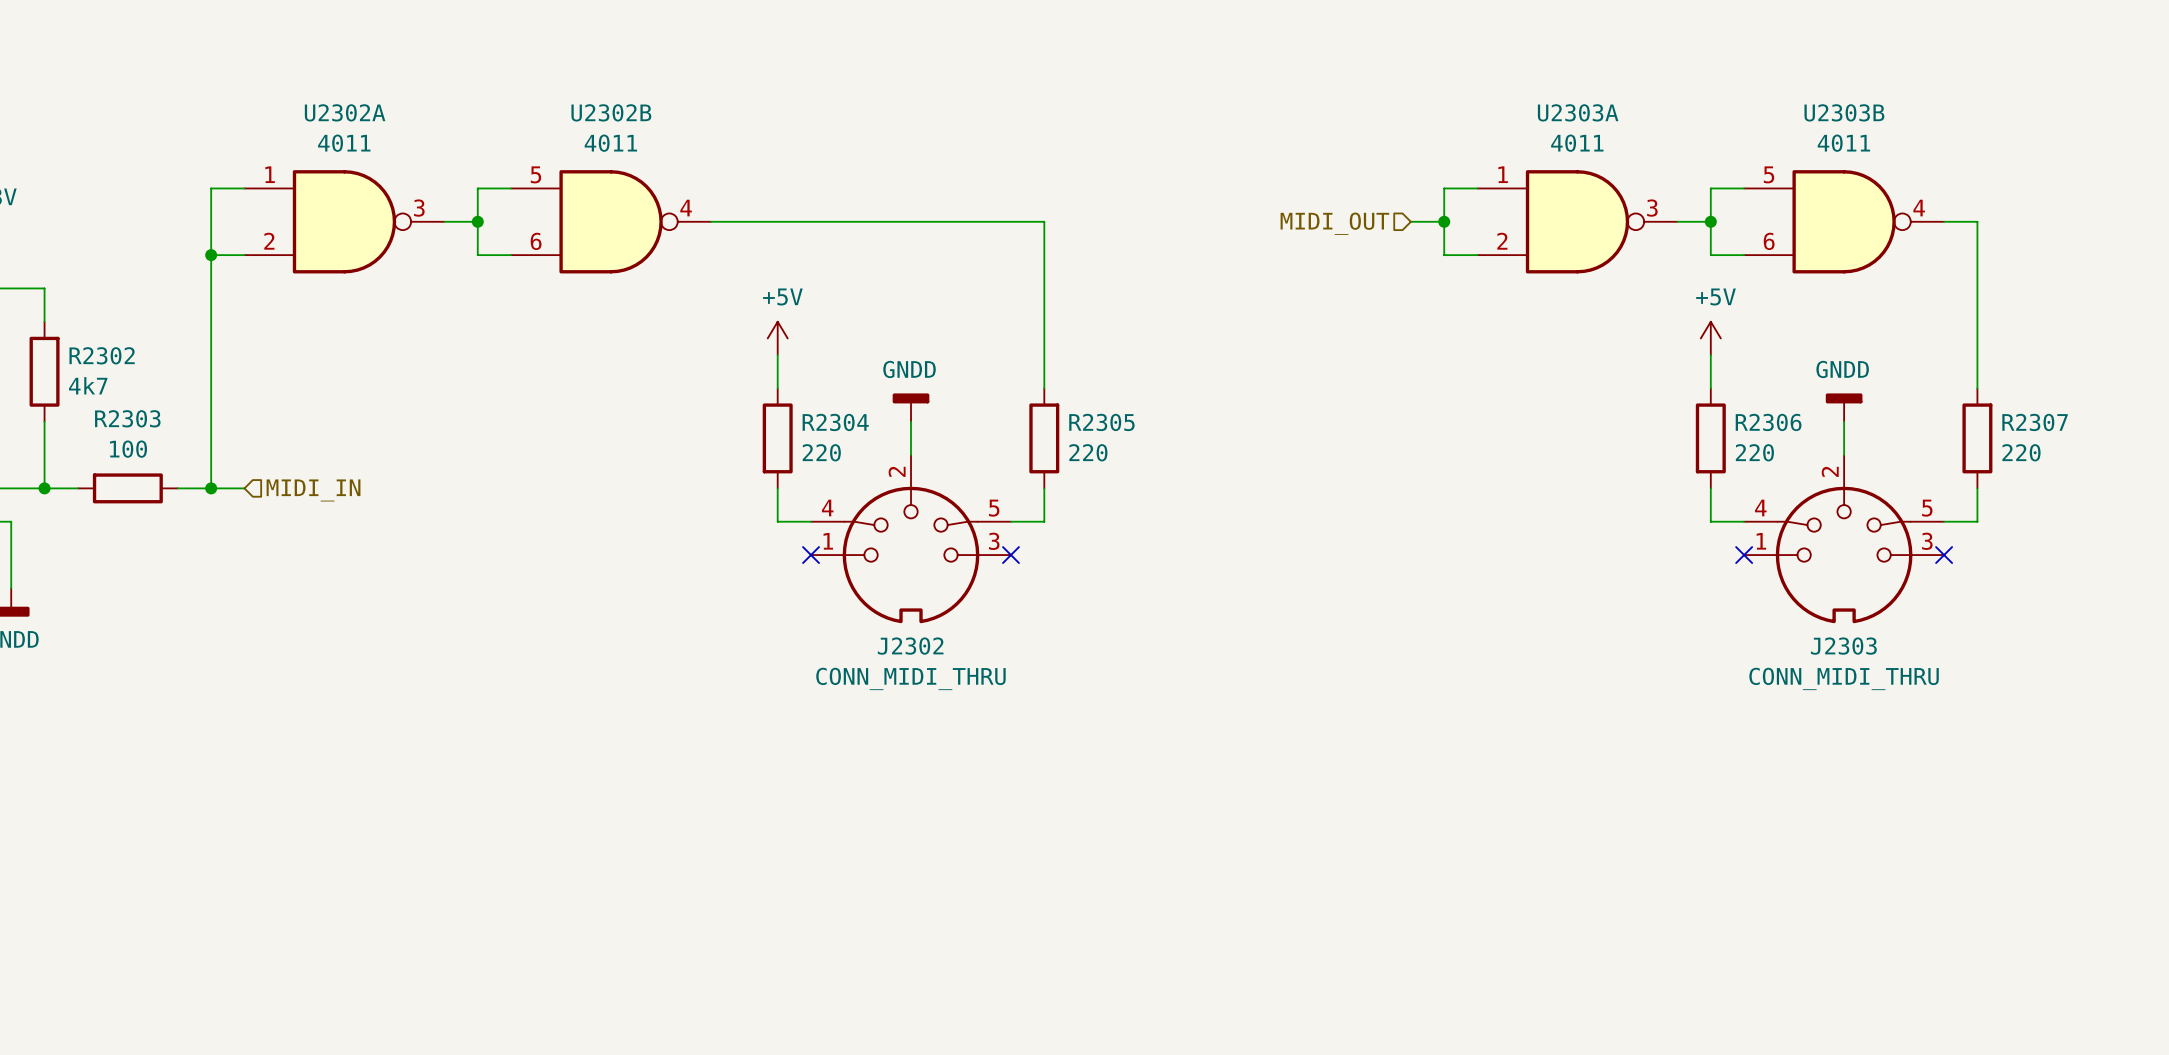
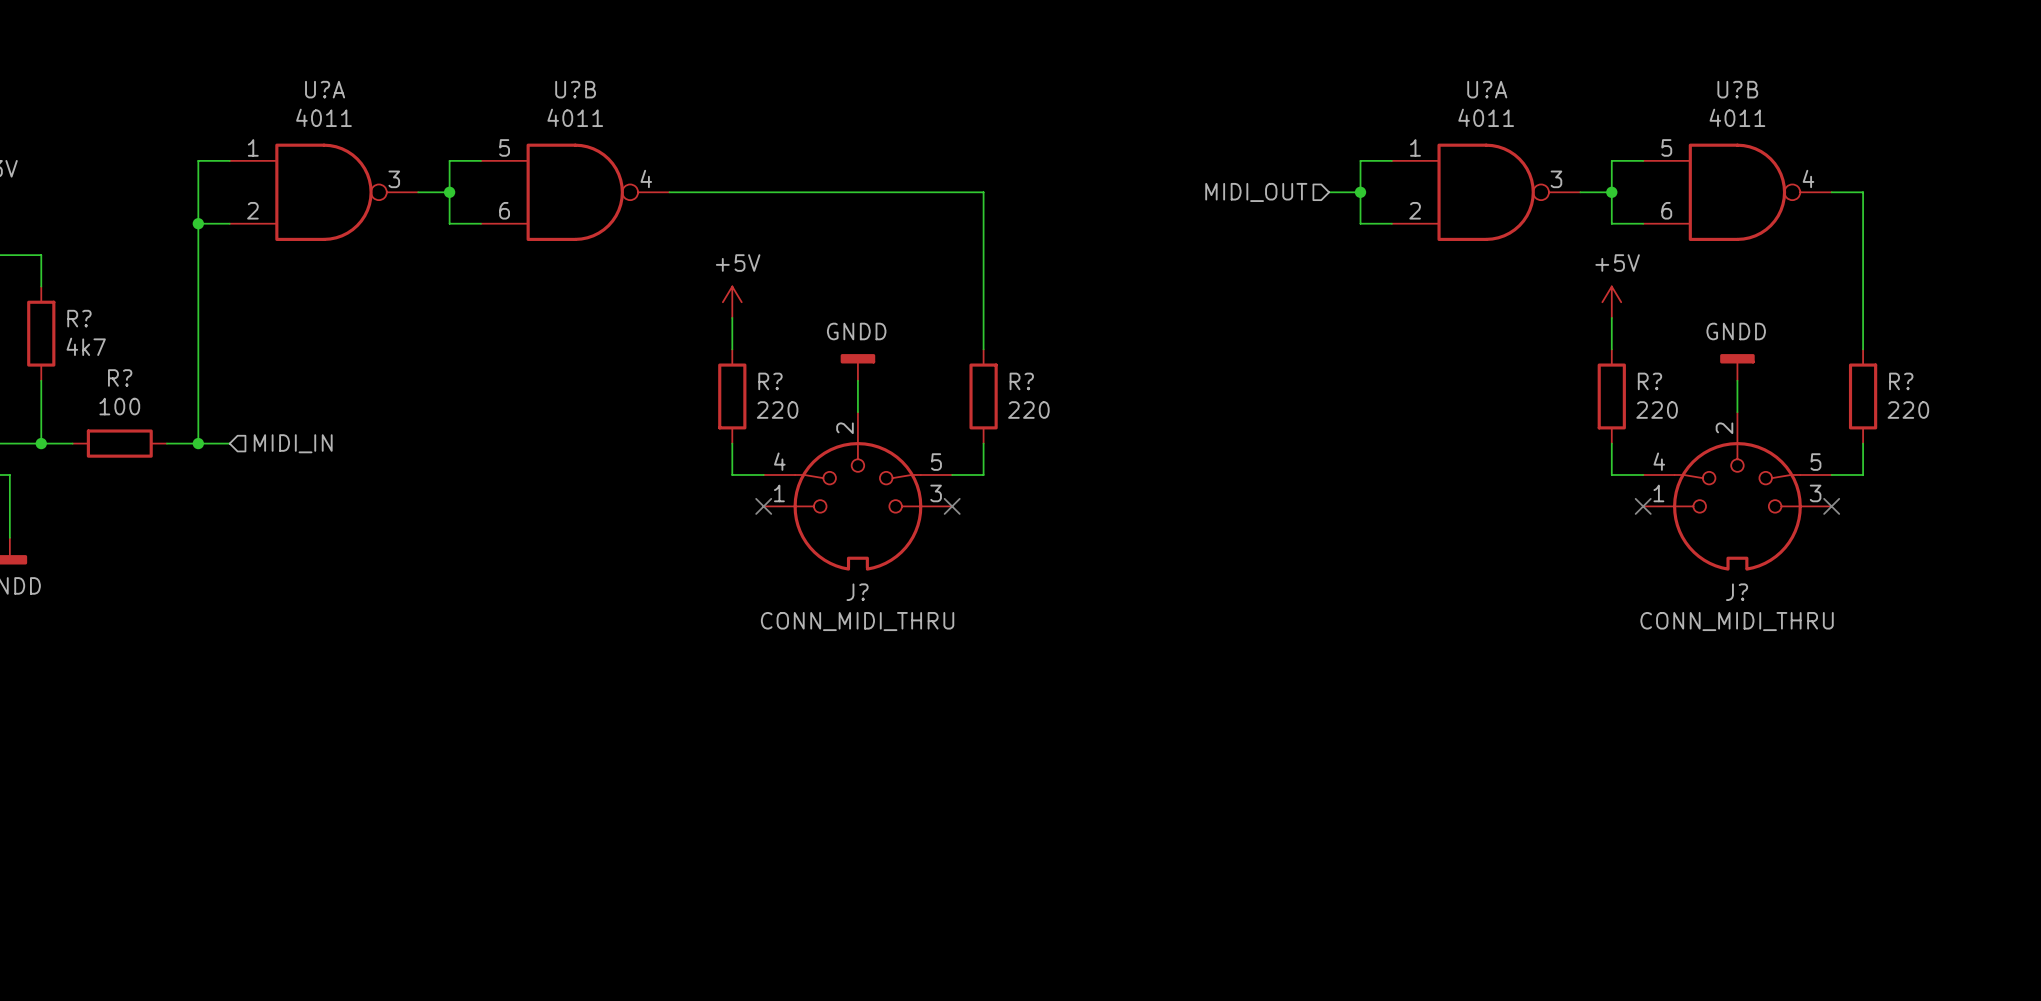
U2302A name: U2302A (345, 112) -> U?A (325, 89)
U2302B name: U2302B (611, 112) -> U?B (575, 89)
U2303A name: U2303A (1578, 112) -> U?A (1487, 89)
U2303B name: U2303B (1844, 112) -> U?B (1737, 89)
R2302 name: R2302 (102, 355) -> R? (79, 318)
R2303 name: R2303 (127, 418) -> R? (120, 377)
R2304 name: R2304 (835, 422) -> R? (770, 381)
R2305 name: R2305 (1101, 422) -> R? (1021, 381)
R2306 name: R2306 (1768, 422) -> R? (1649, 381)
R2307 name: R2307 (2035, 422) -> R? (1901, 381)
J2302 name: J2302 (910, 646) -> J? (857, 592)
J2303 name: J2303 (1843, 646) -> J? (1737, 592)

